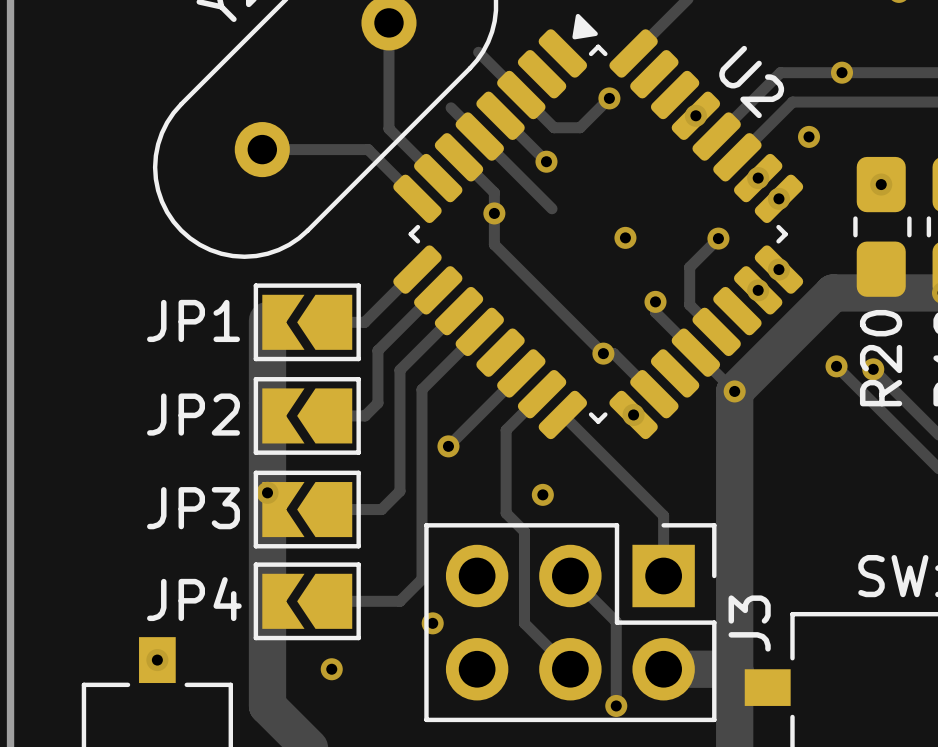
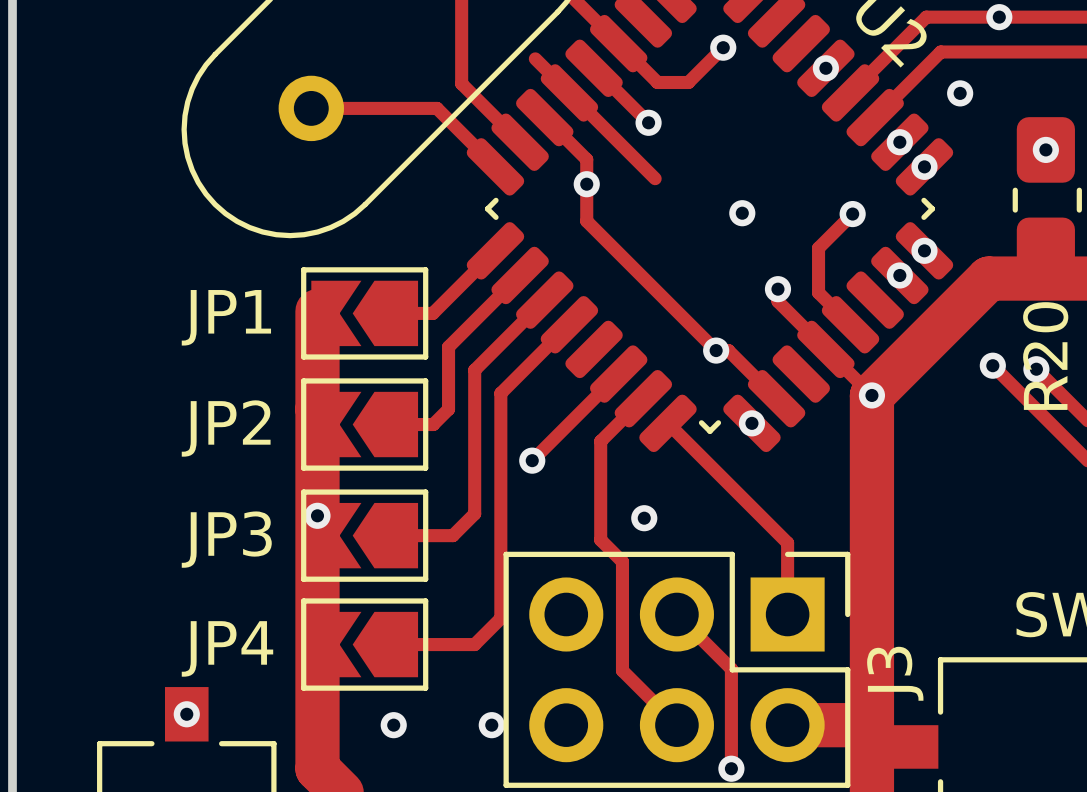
via position: (432, 623) -> (491, 725)

